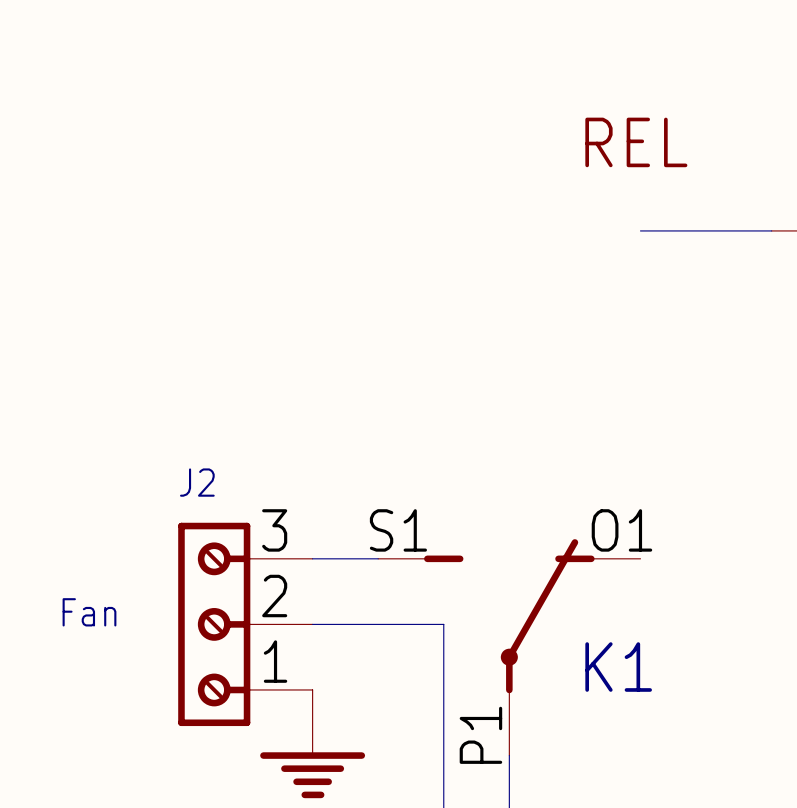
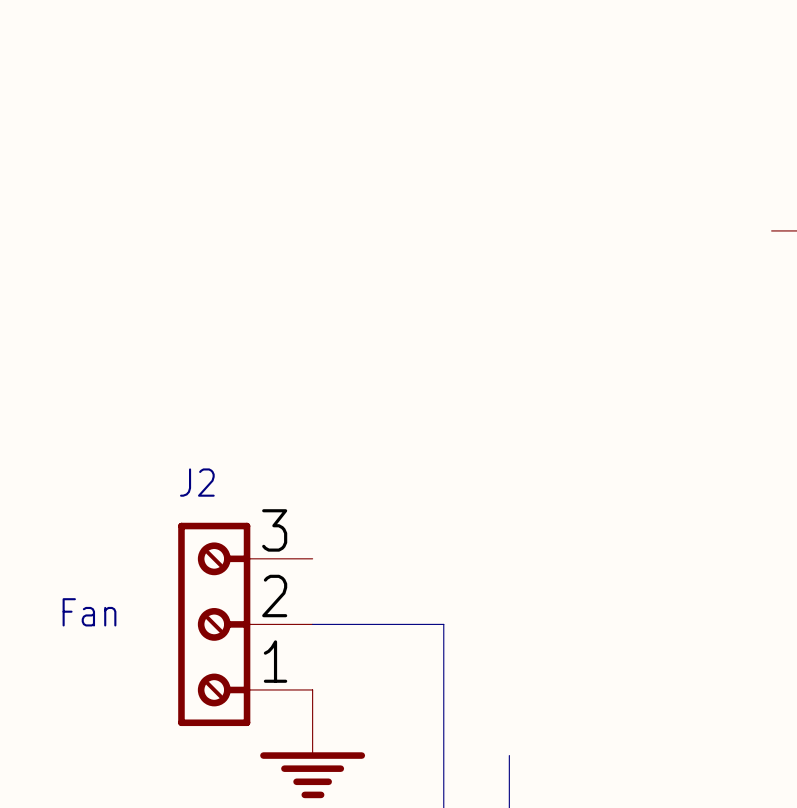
label: REL (636, 142) -> none
wire: (640, 230) (771, 230) -> none
wire: (312, 558) (378, 558) -> none
K1: (509, 647) -> none

